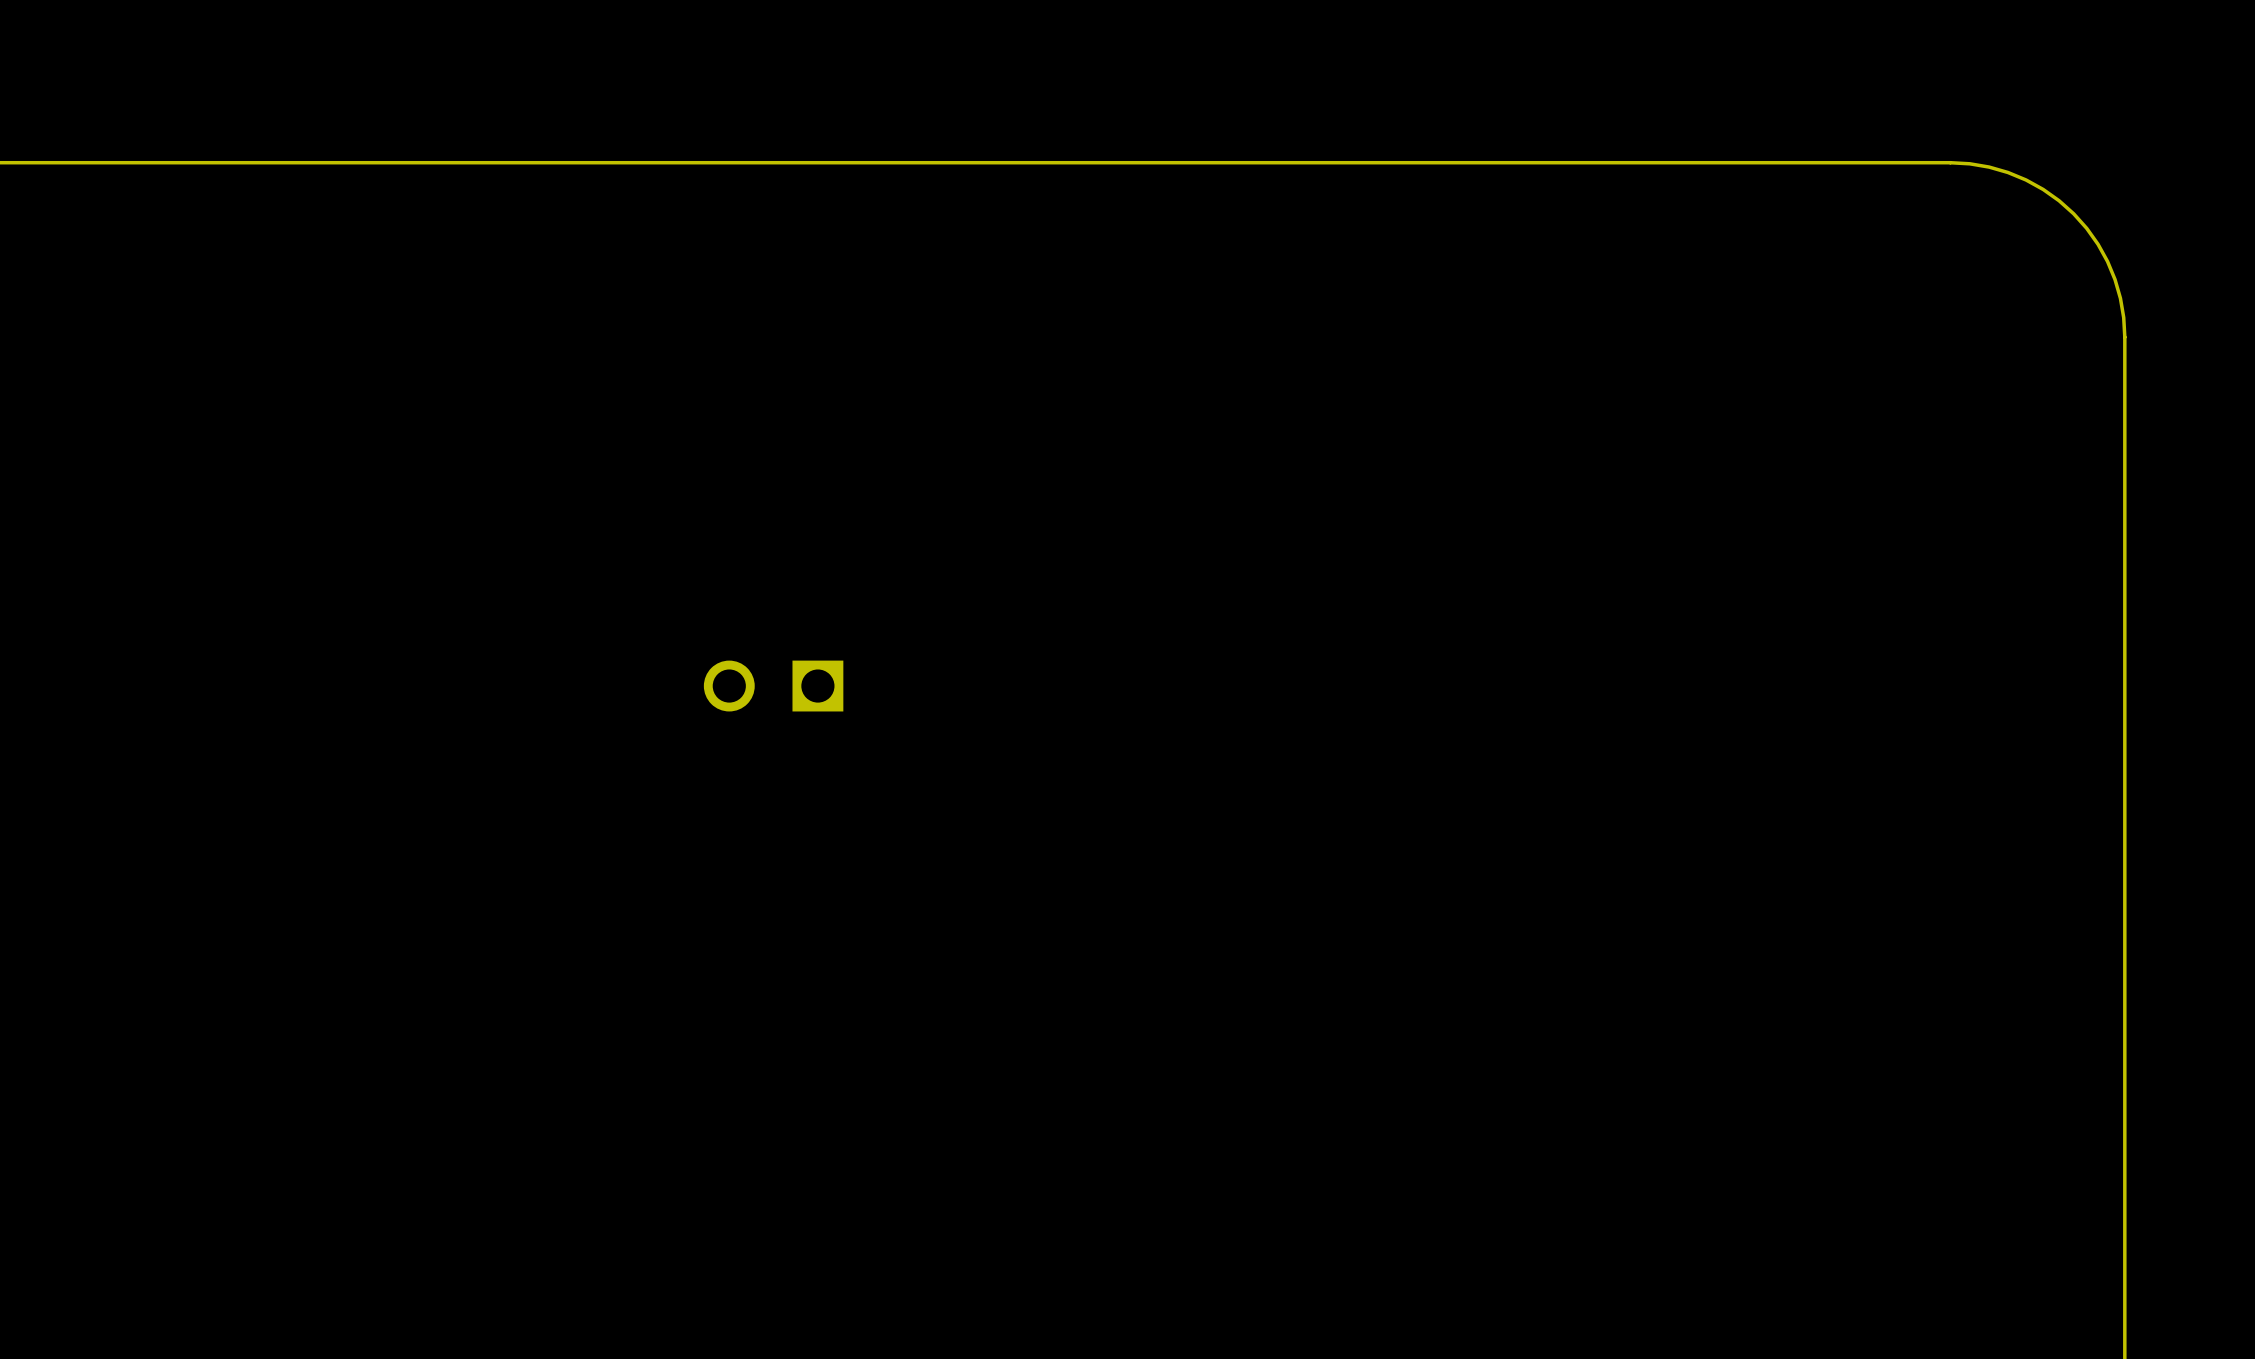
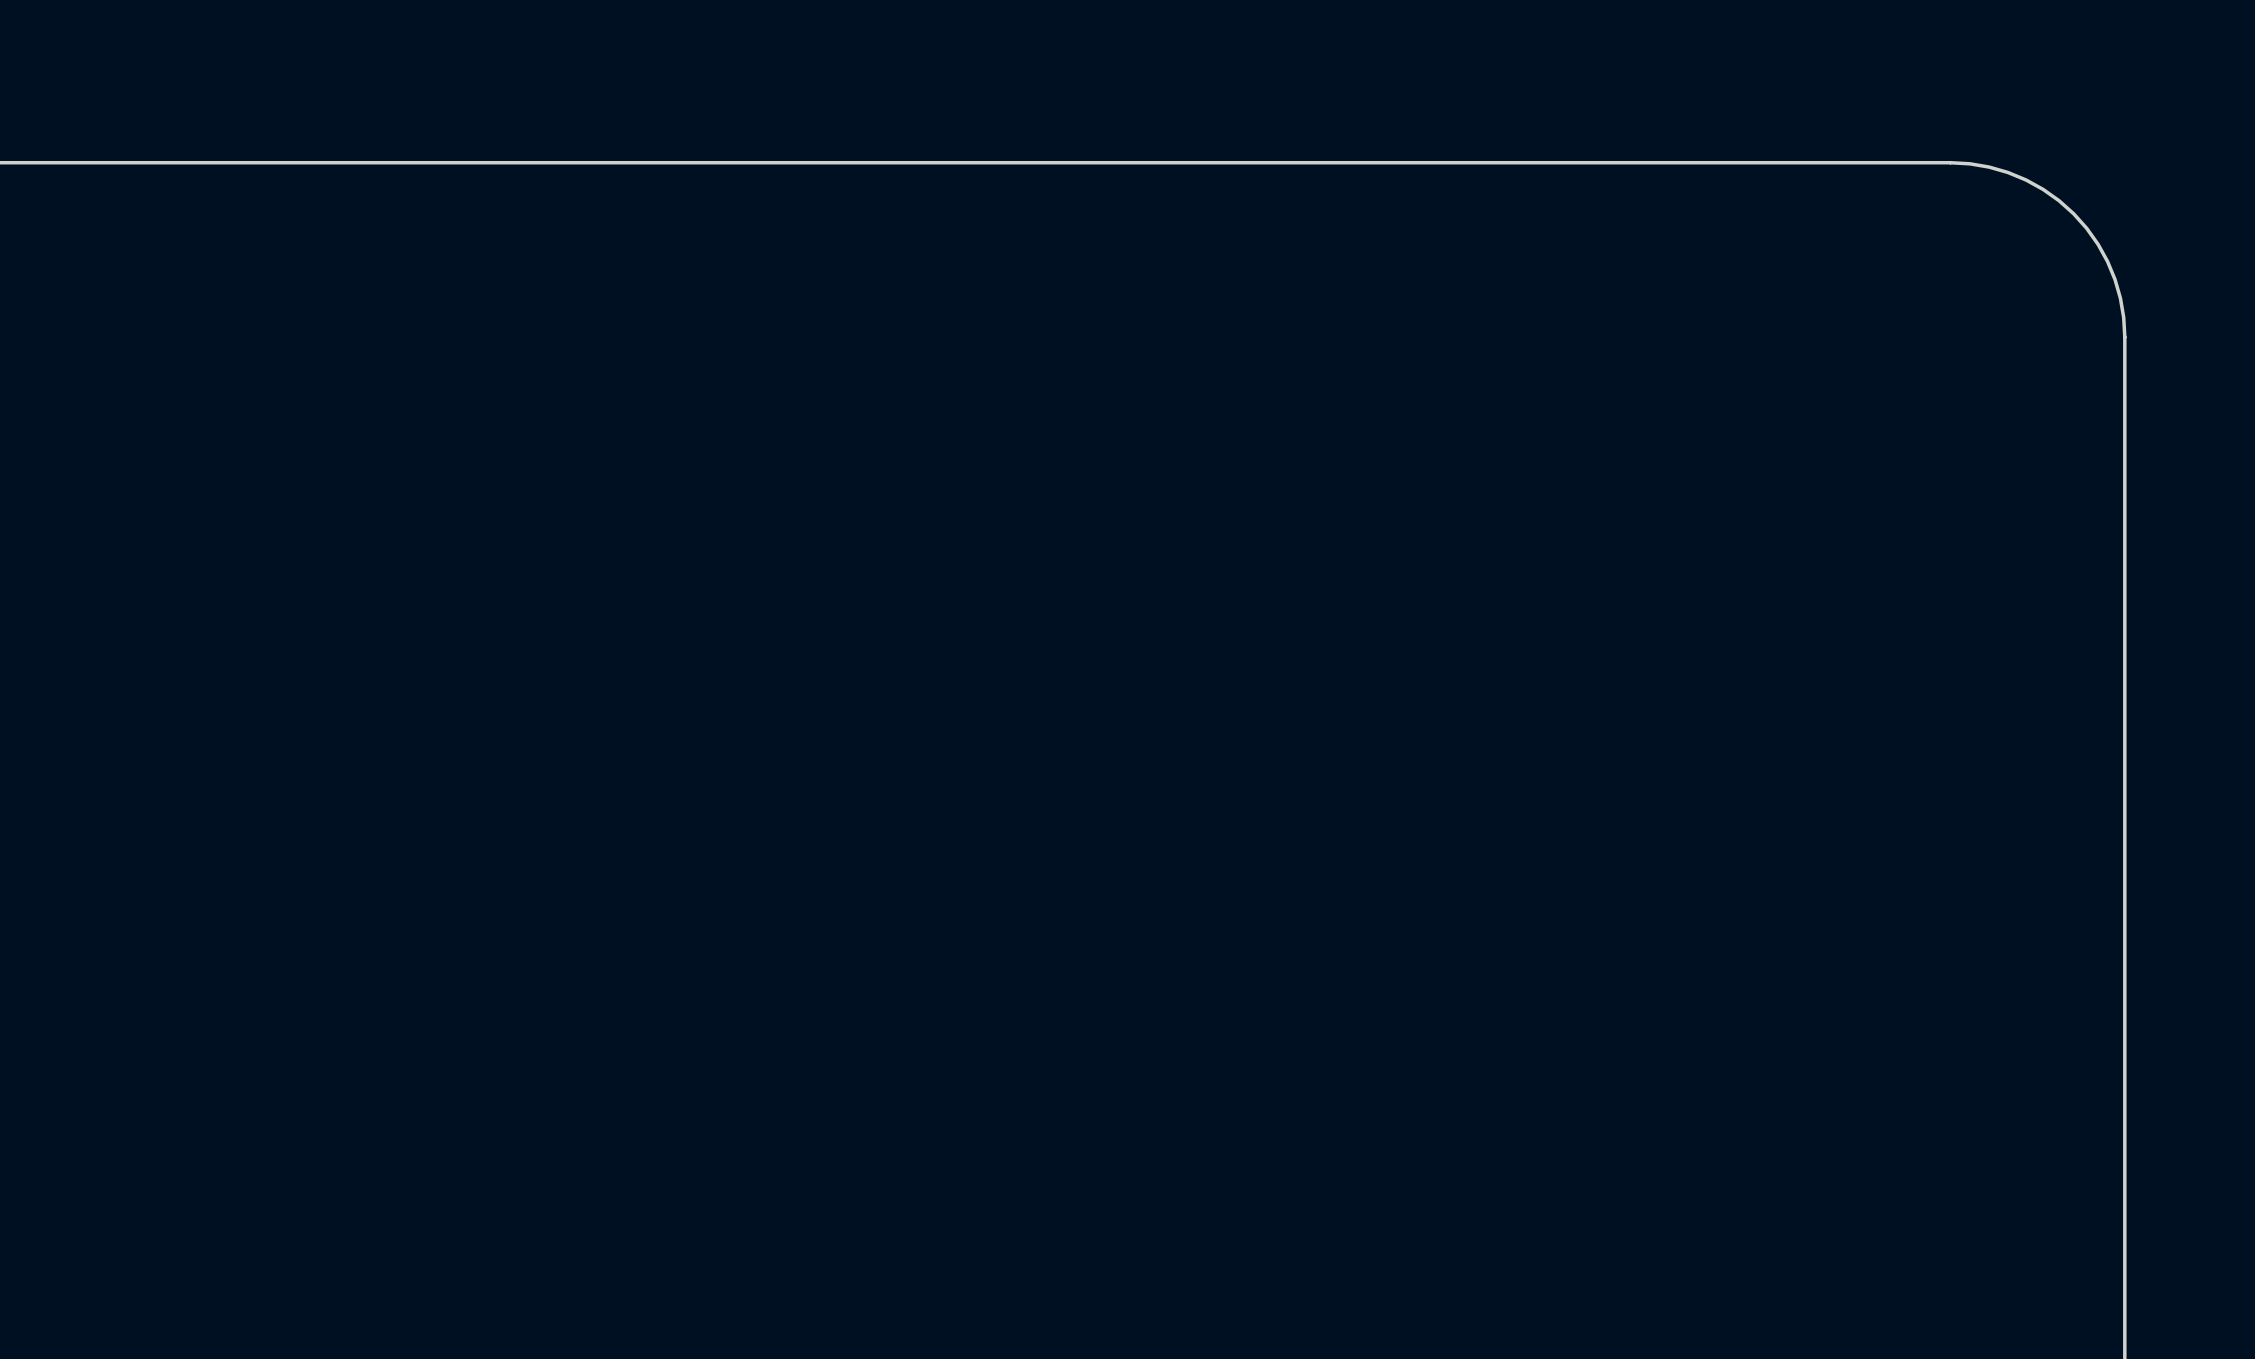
part: (773, 686) -> none

